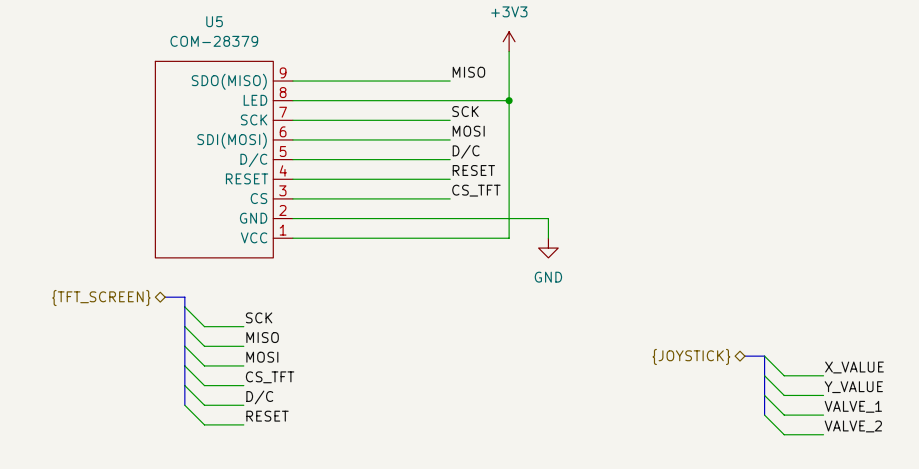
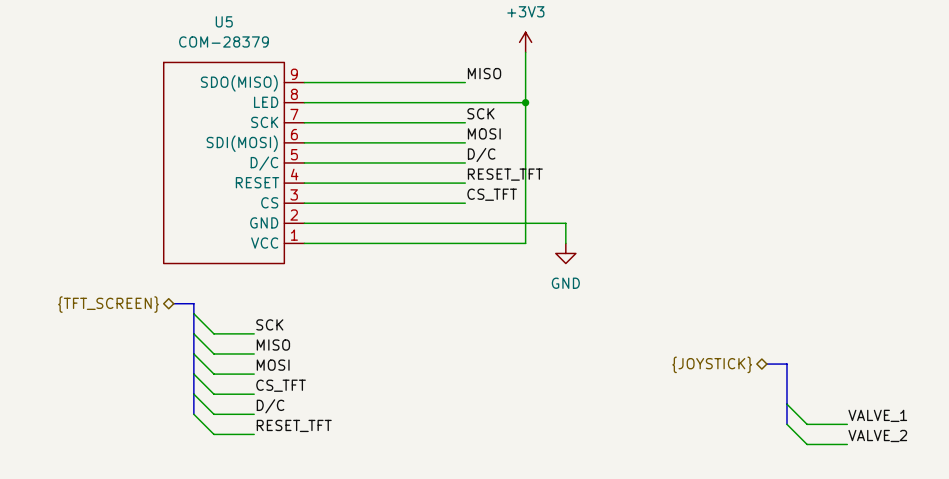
label: RESET (473, 170) -> RESET_TFT (505, 174)
wire: (764, 356) (784, 375) (823, 375) -> none
label: X_VALUE (854, 367) -> none
wire: (764, 375) (784, 395) (823, 395) -> none
label: Y_VALUE (853, 387) -> none
label: RESET (267, 416) -> RESET_TFT (294, 425)

